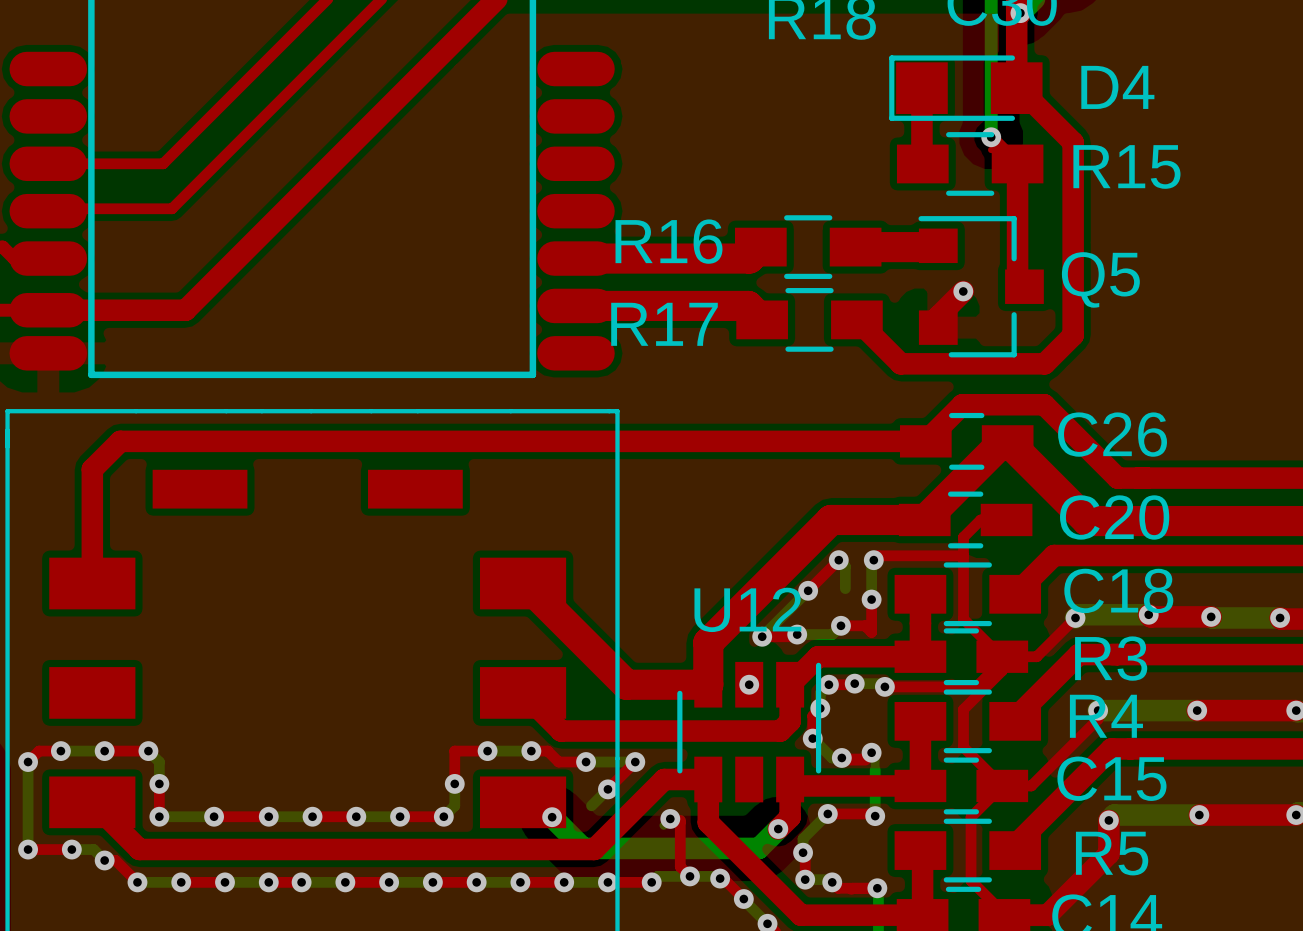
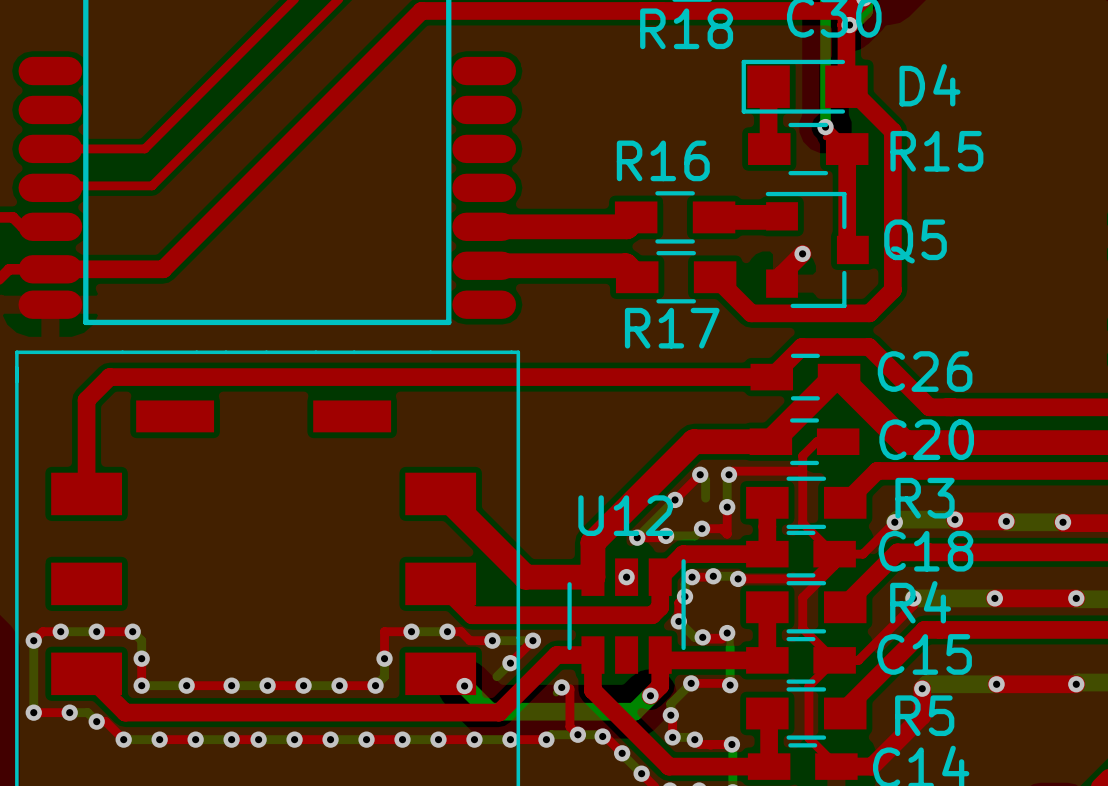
R16 name position: R16 (668, 241) -> R16 (663, 160)
R17 name position: R17 (664, 324) -> R17 (672, 328)
C18 name position: C18 (1118, 590) -> C18 (925, 551)
R3 name position: R3 (1111, 658) -> R3 (925, 498)

